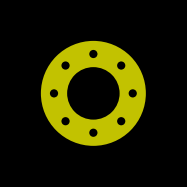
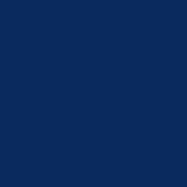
part: (93, 93) -> none

